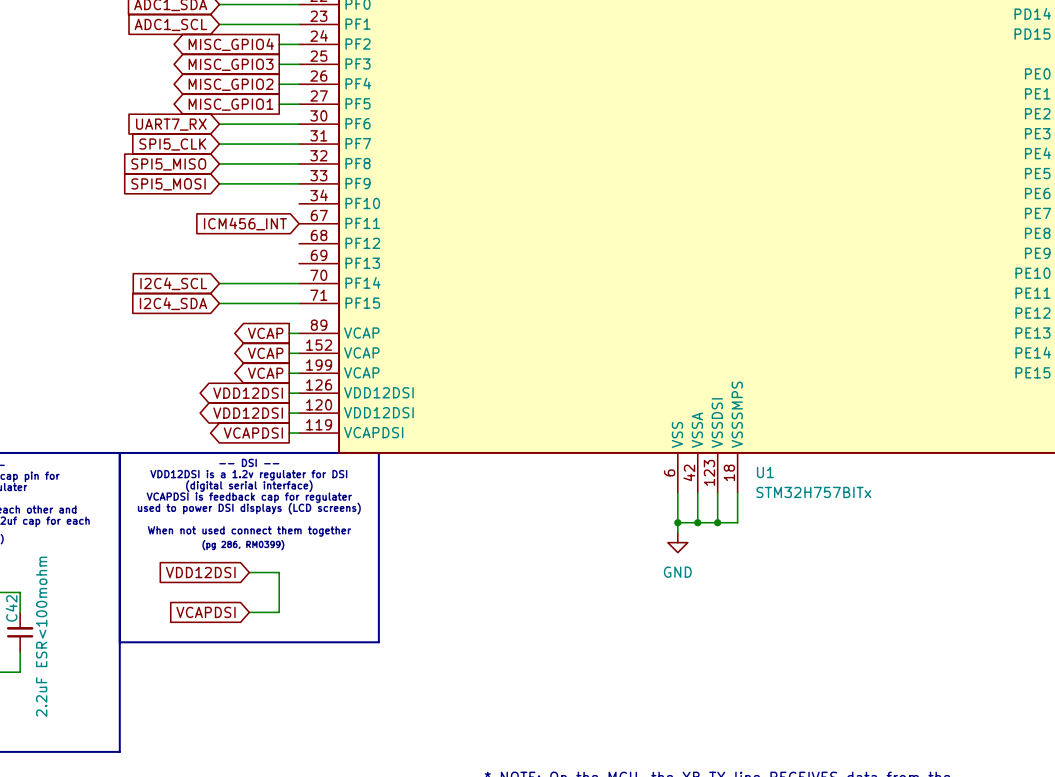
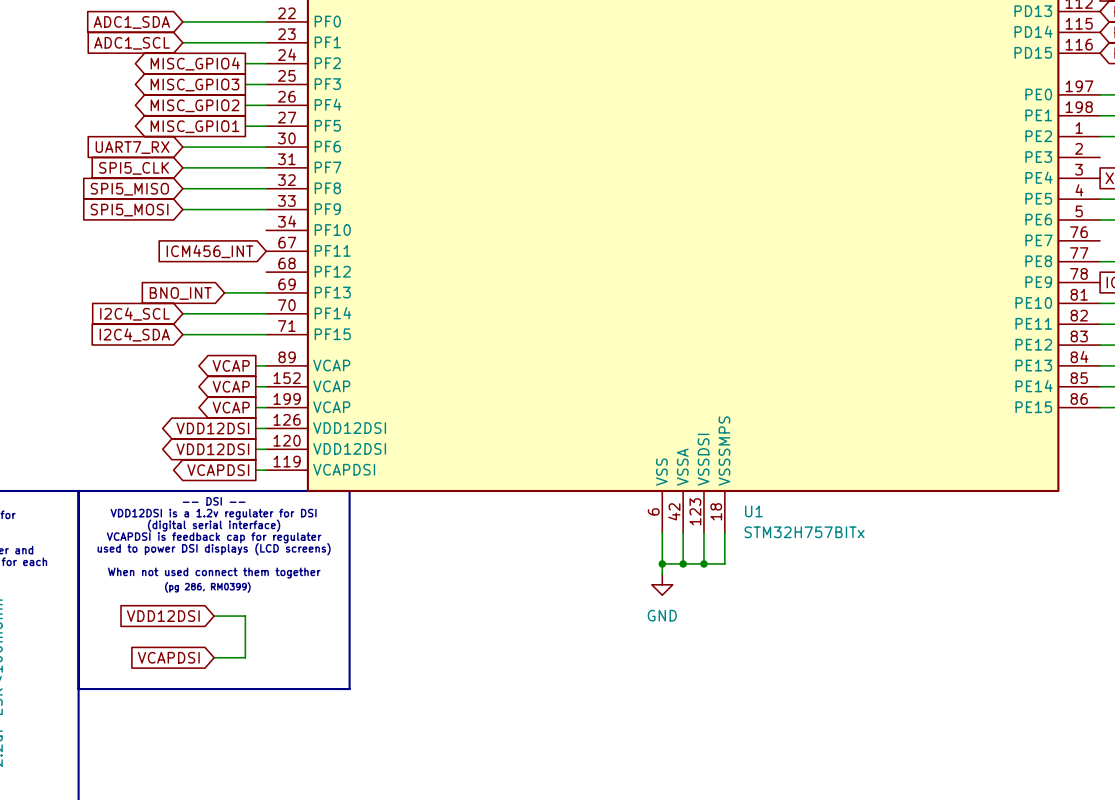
wire: none -> (224, 292) (266, 292)
global label: none -> BNO_INT (180, 293)

